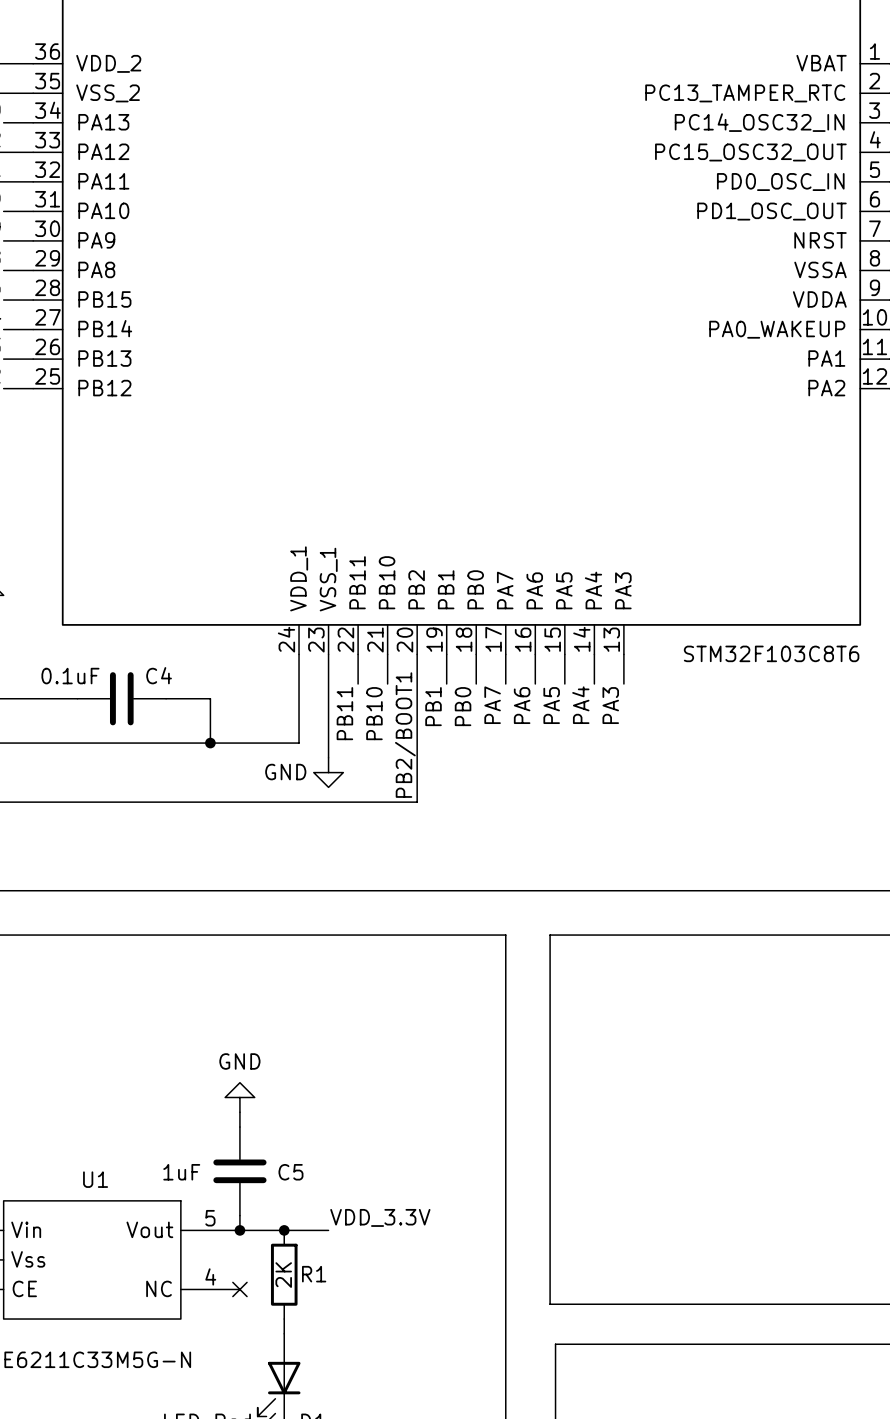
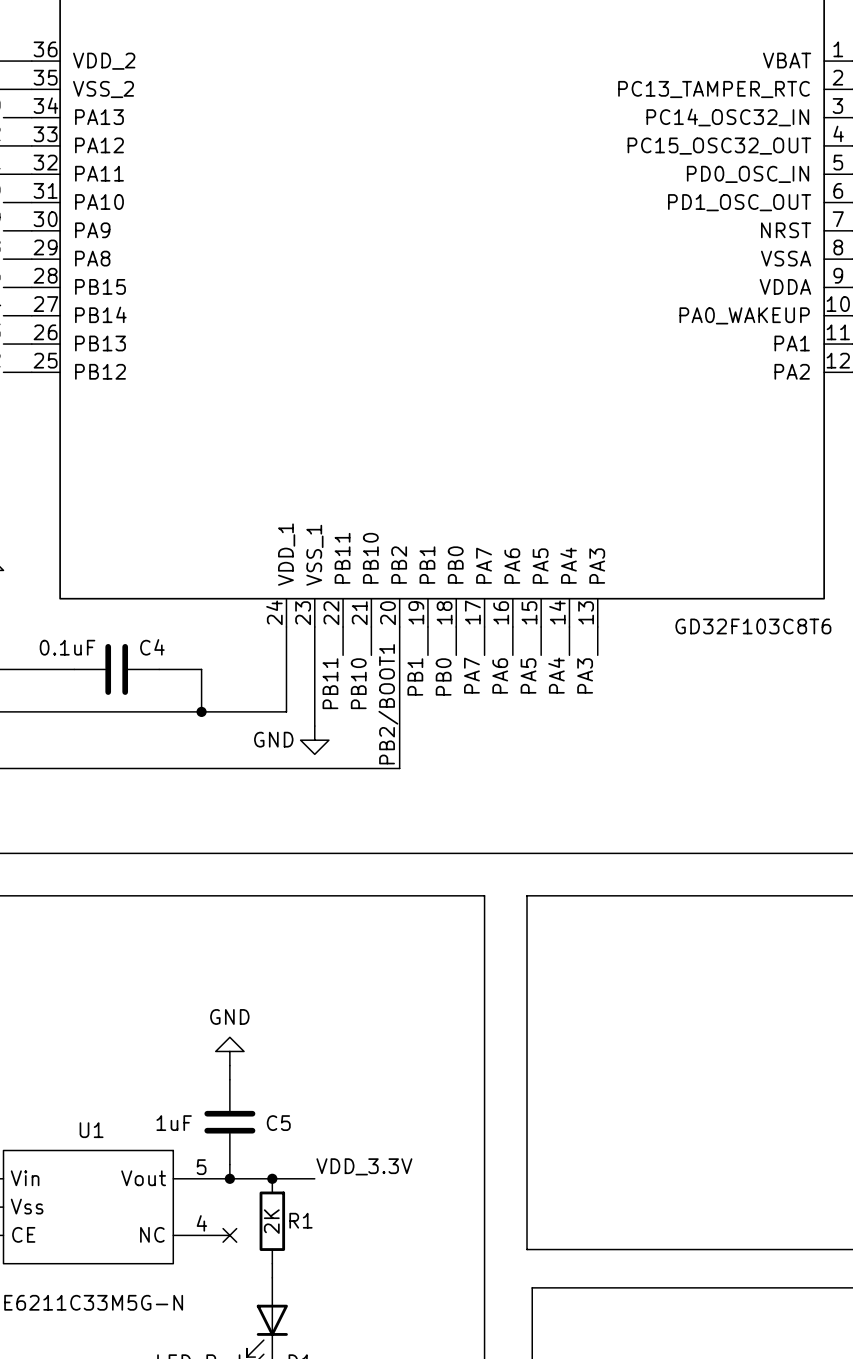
part value: STM32F103C8T6 (771, 653) -> GD32F103C8T6 (753, 626)

